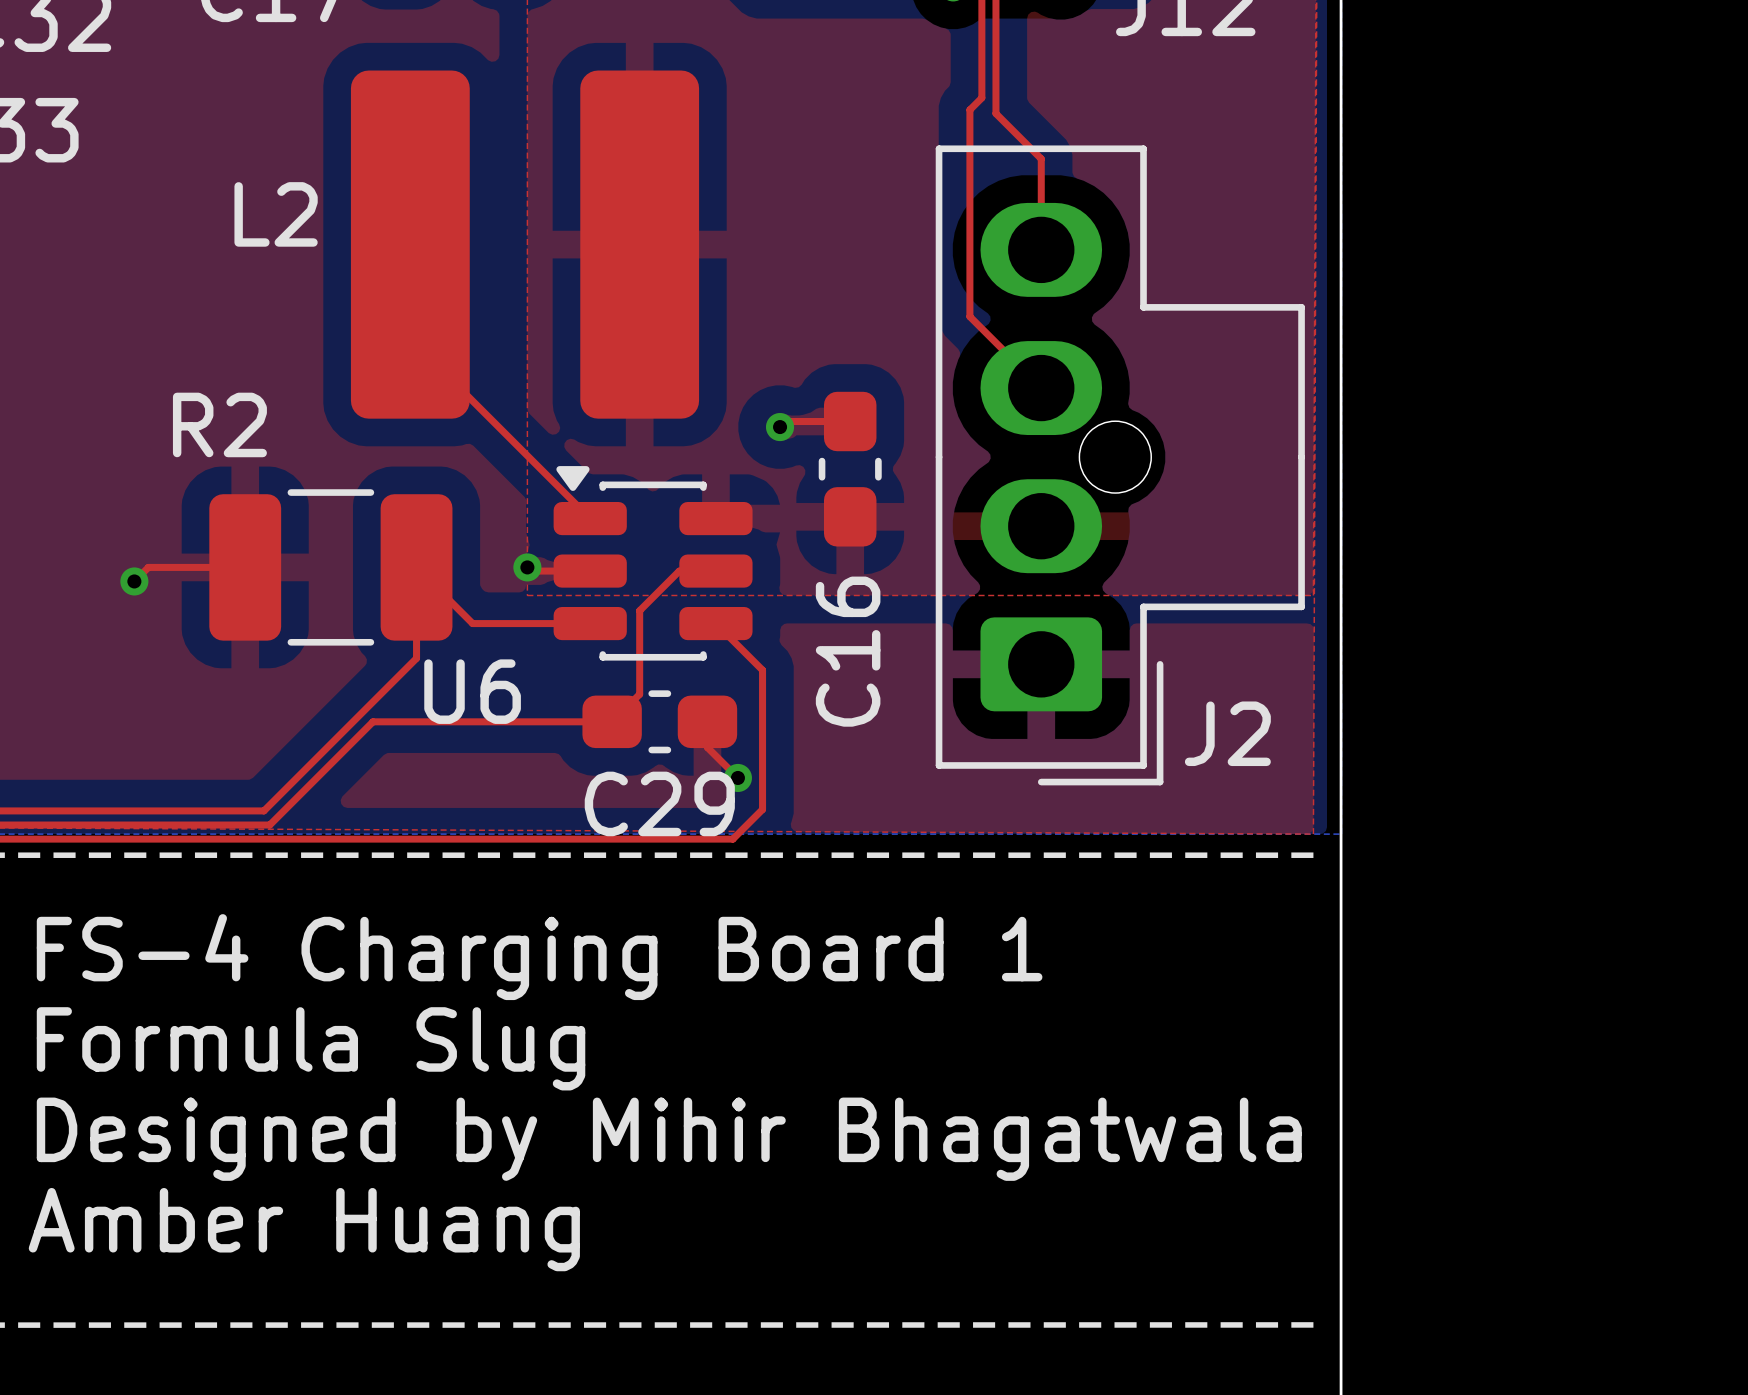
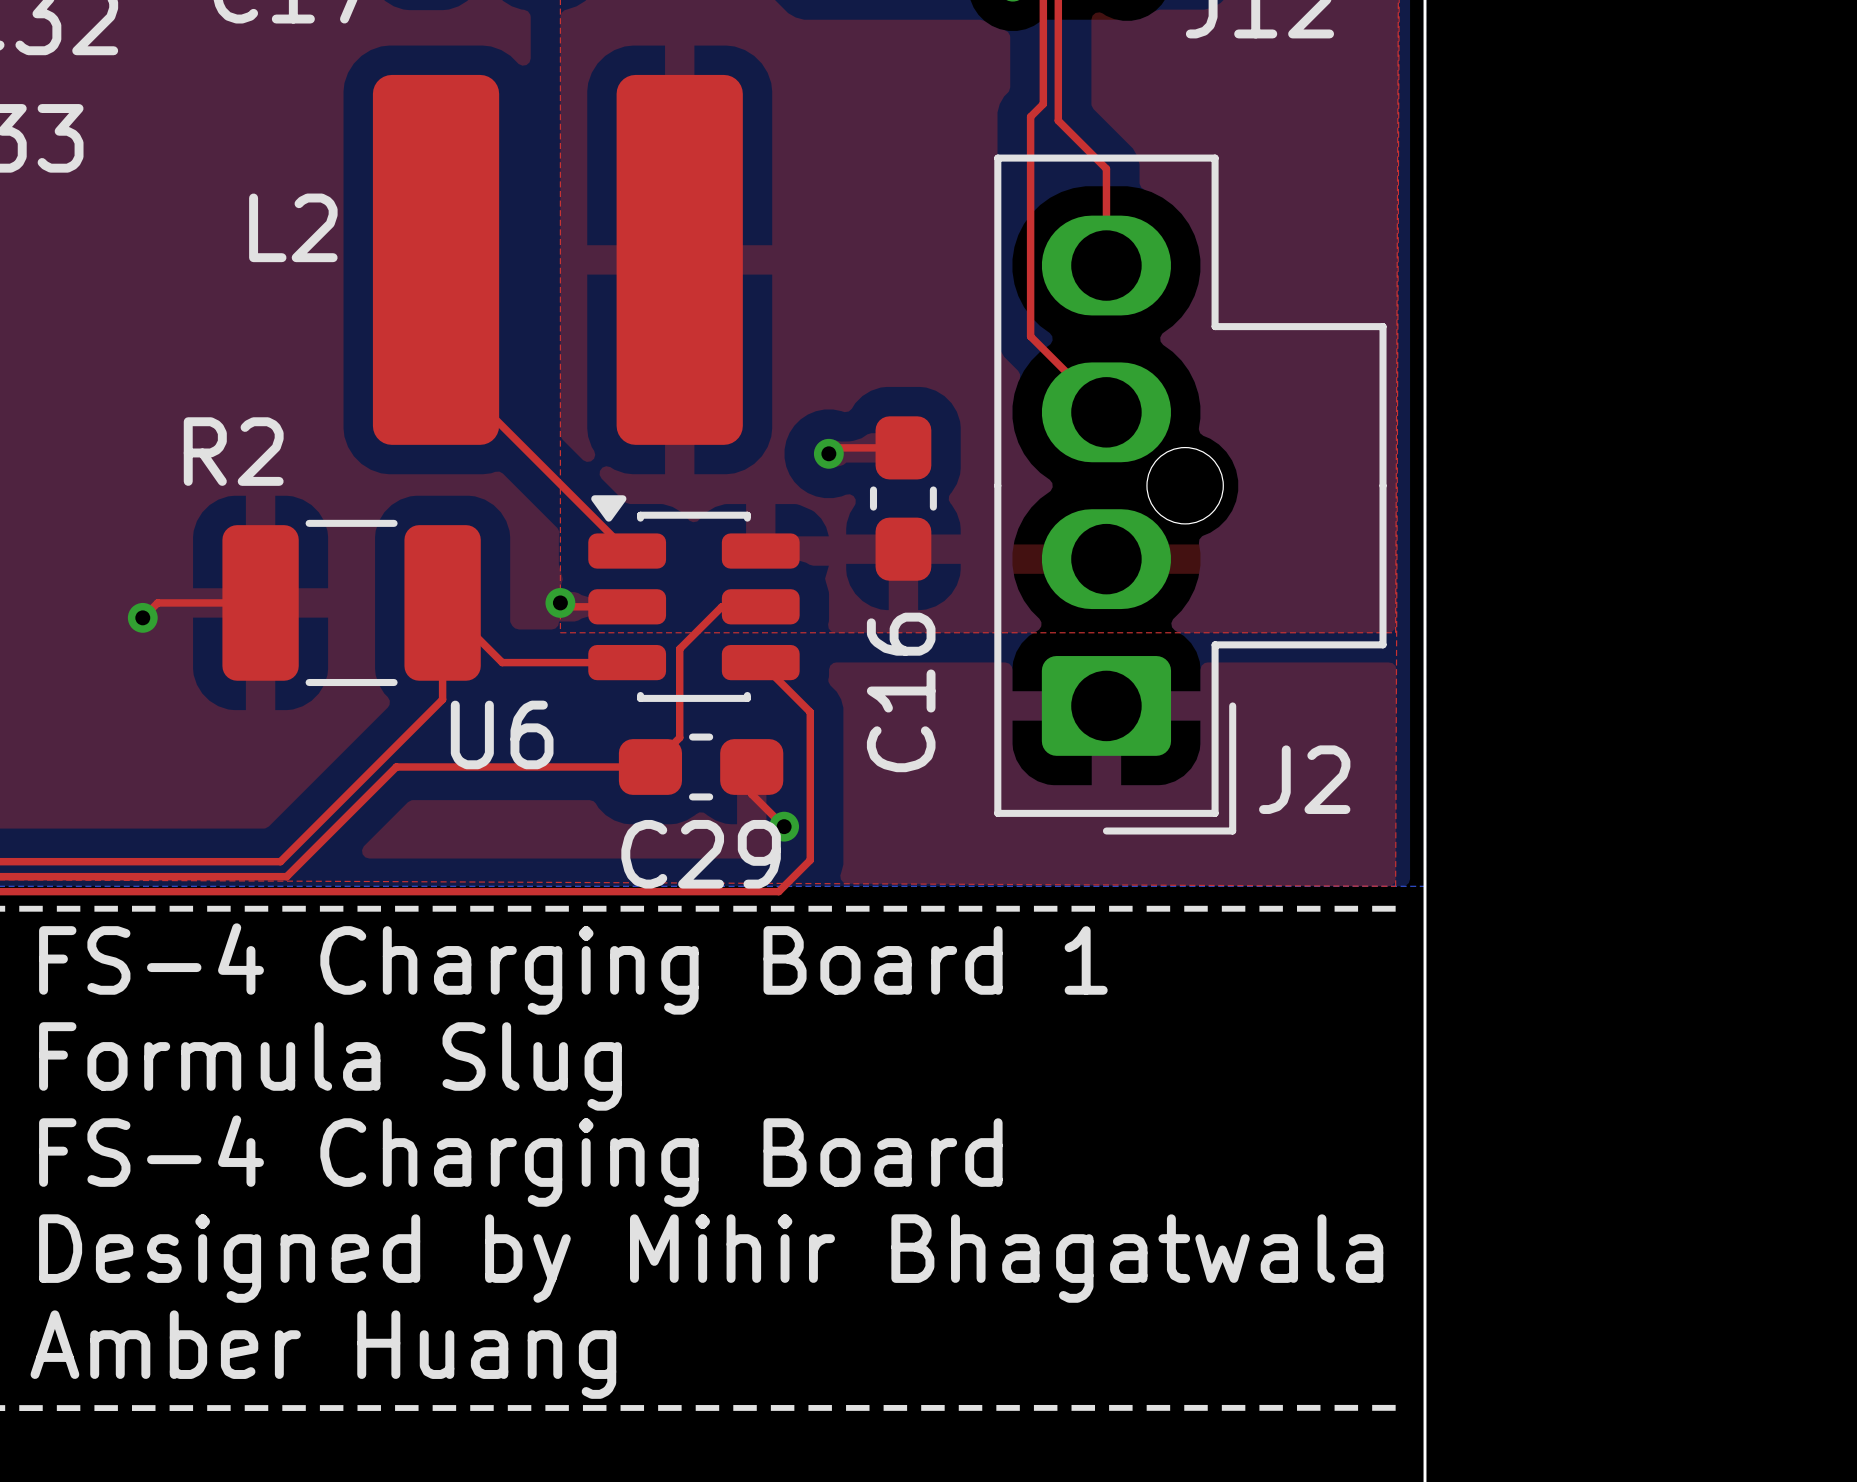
text position: FS-4 Charging Board 1 (539, 957) -> FS-4 Charging Board 1 (573, 968)
text position: Formula Slug (311, 1048) -> Formula Slug (330, 1066)
text: none -> FS-4 Charging Board (520, 1161)
text position: Designed by Mihir Bhagatwala (669, 1139) -> Designed by Mihir Bhagatwala (711, 1258)
text position: Amber Huang (304, 1229) -> Amber Huang (323, 1354)

